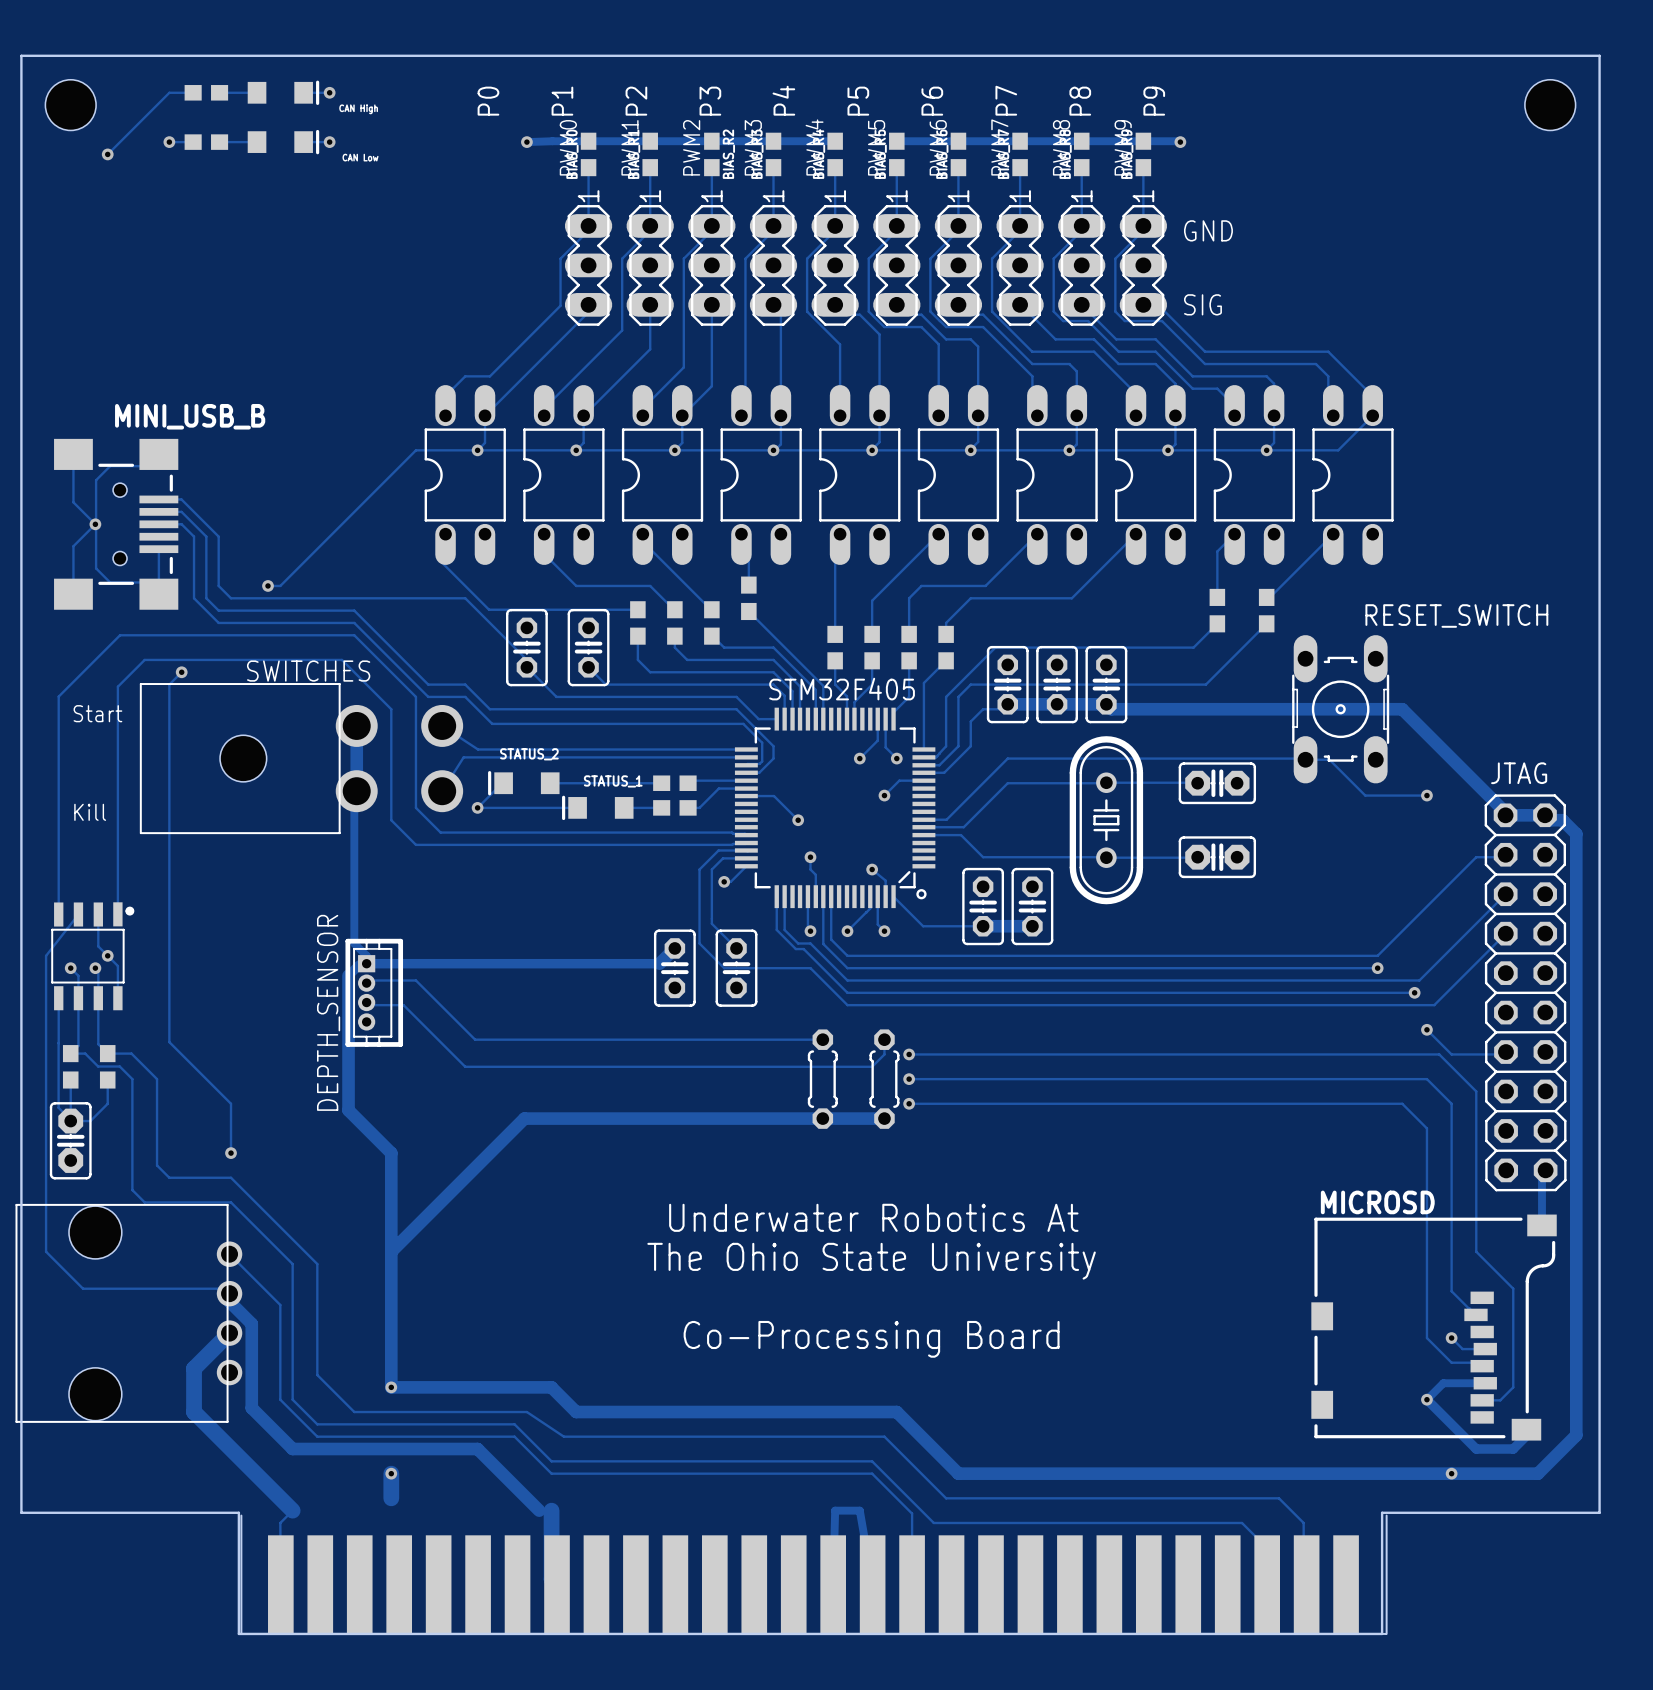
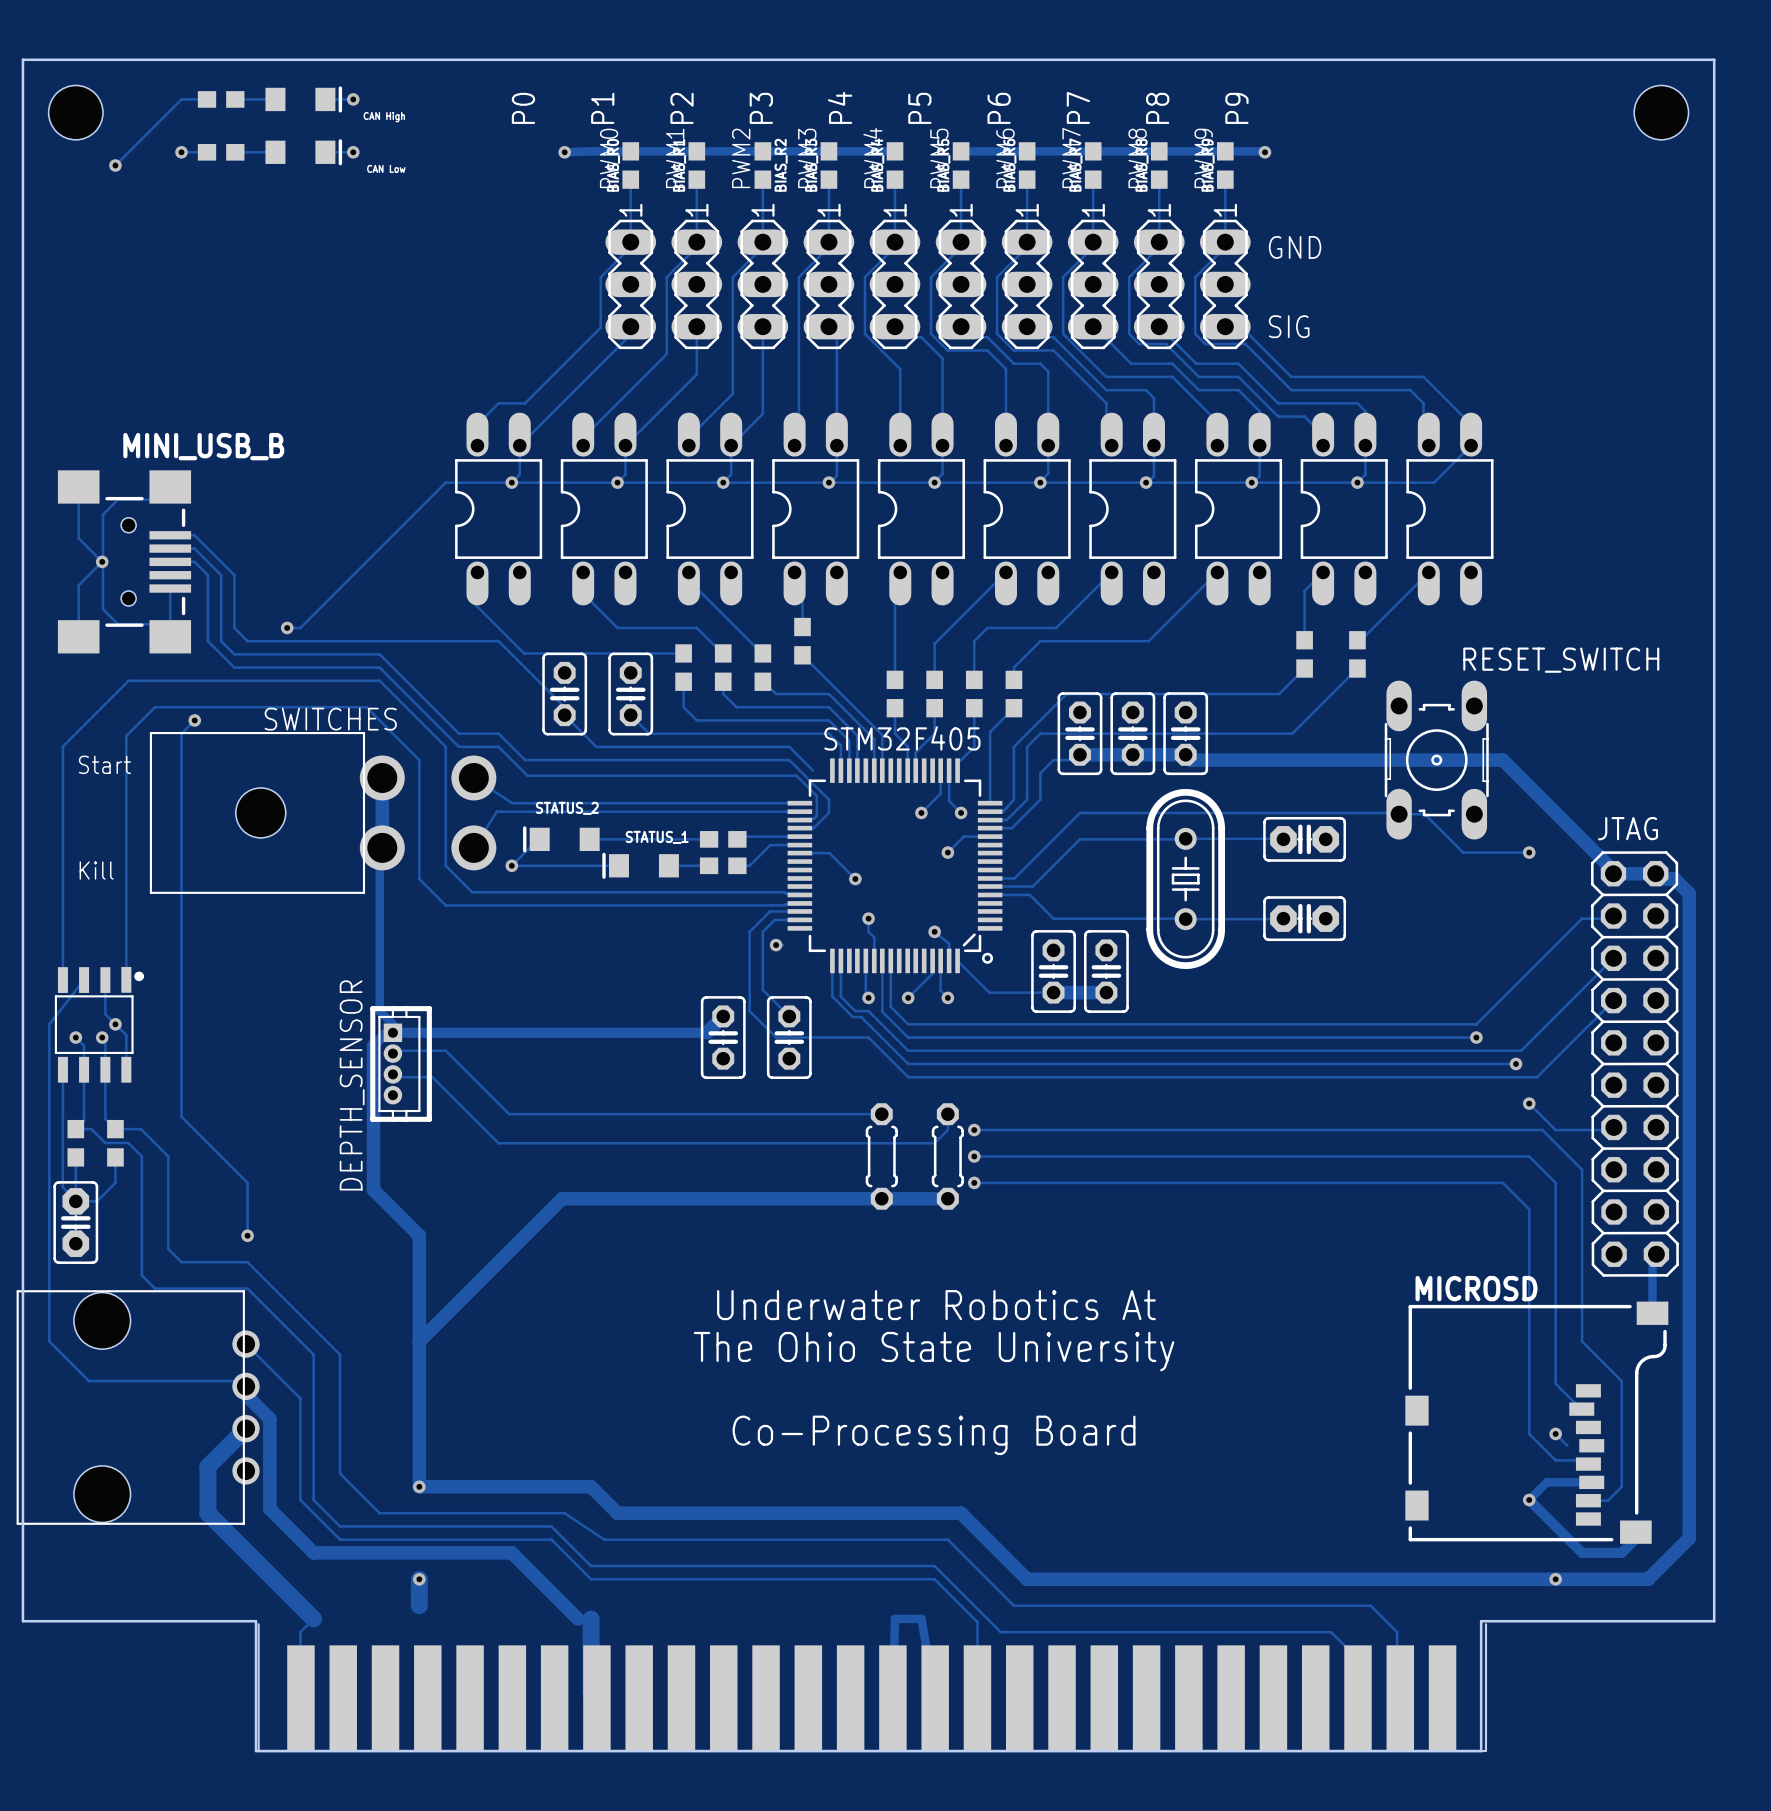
track: (758, 719) (776, 719) -> none
track: (746, 866) (730, 881) -> none
track: (1462, 1349) (1485, 1349) -> none

